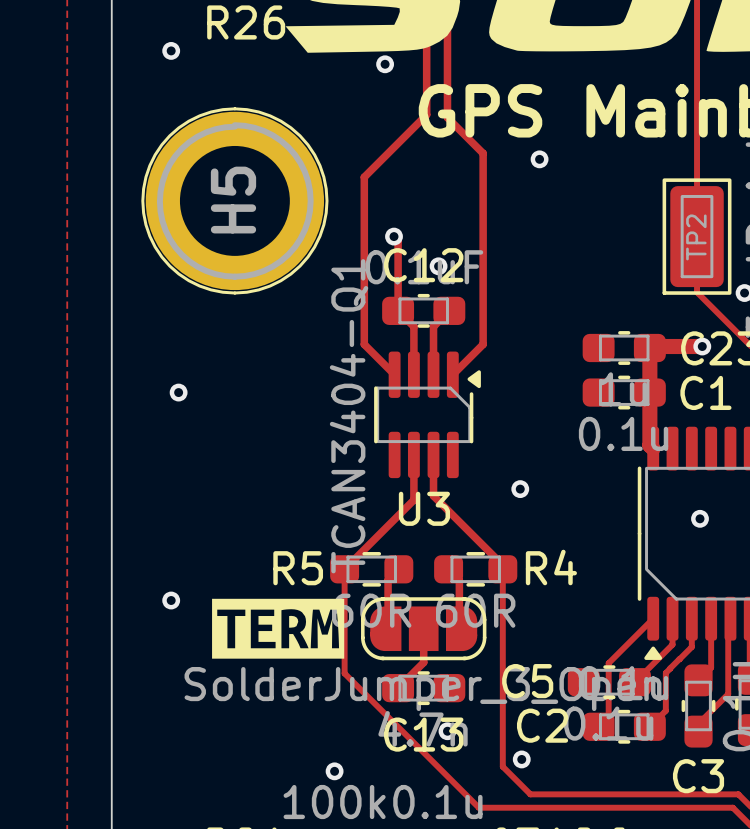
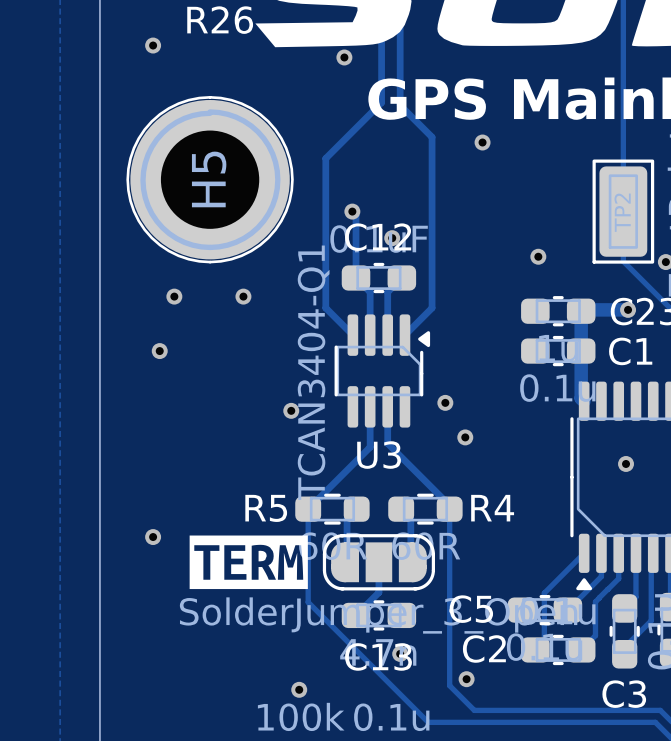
via: none -> (538, 256)
via: none -> (174, 296)
via: none -> (243, 296)
via: none -> (445, 402)
via: none -> (291, 410)

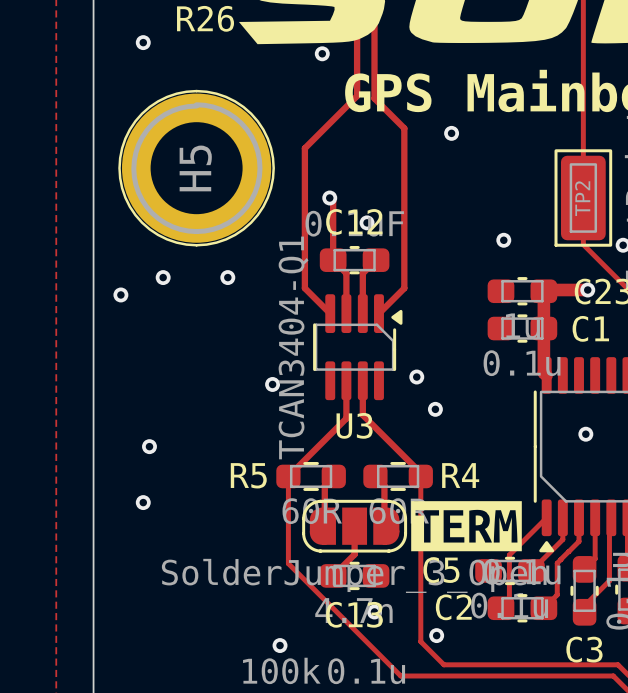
via position: (159, 351) -> (120, 294)
via: none -> (149, 446)
drawing position: (248, 562) -> (466, 526)

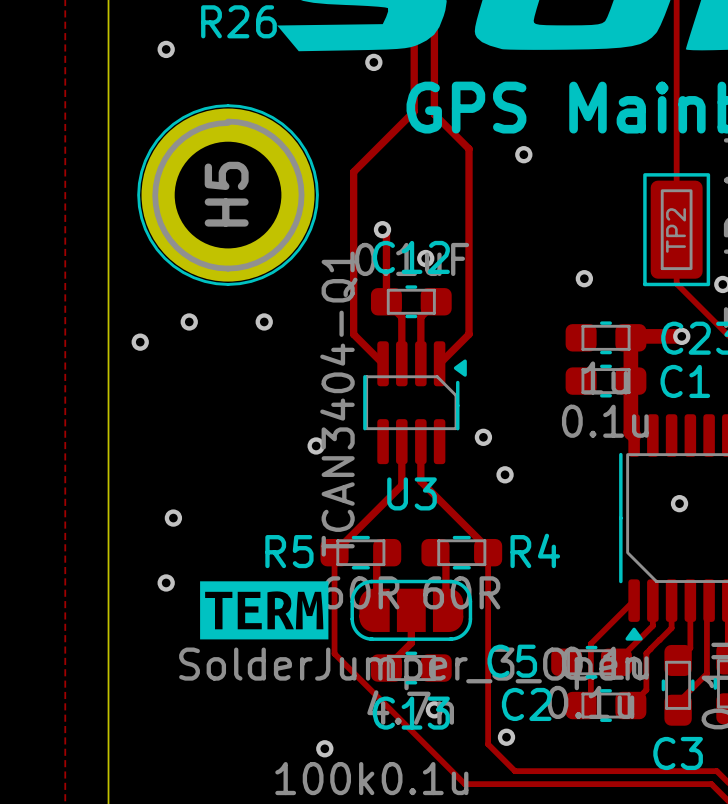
drawing position: (466, 526) -> (264, 610)

